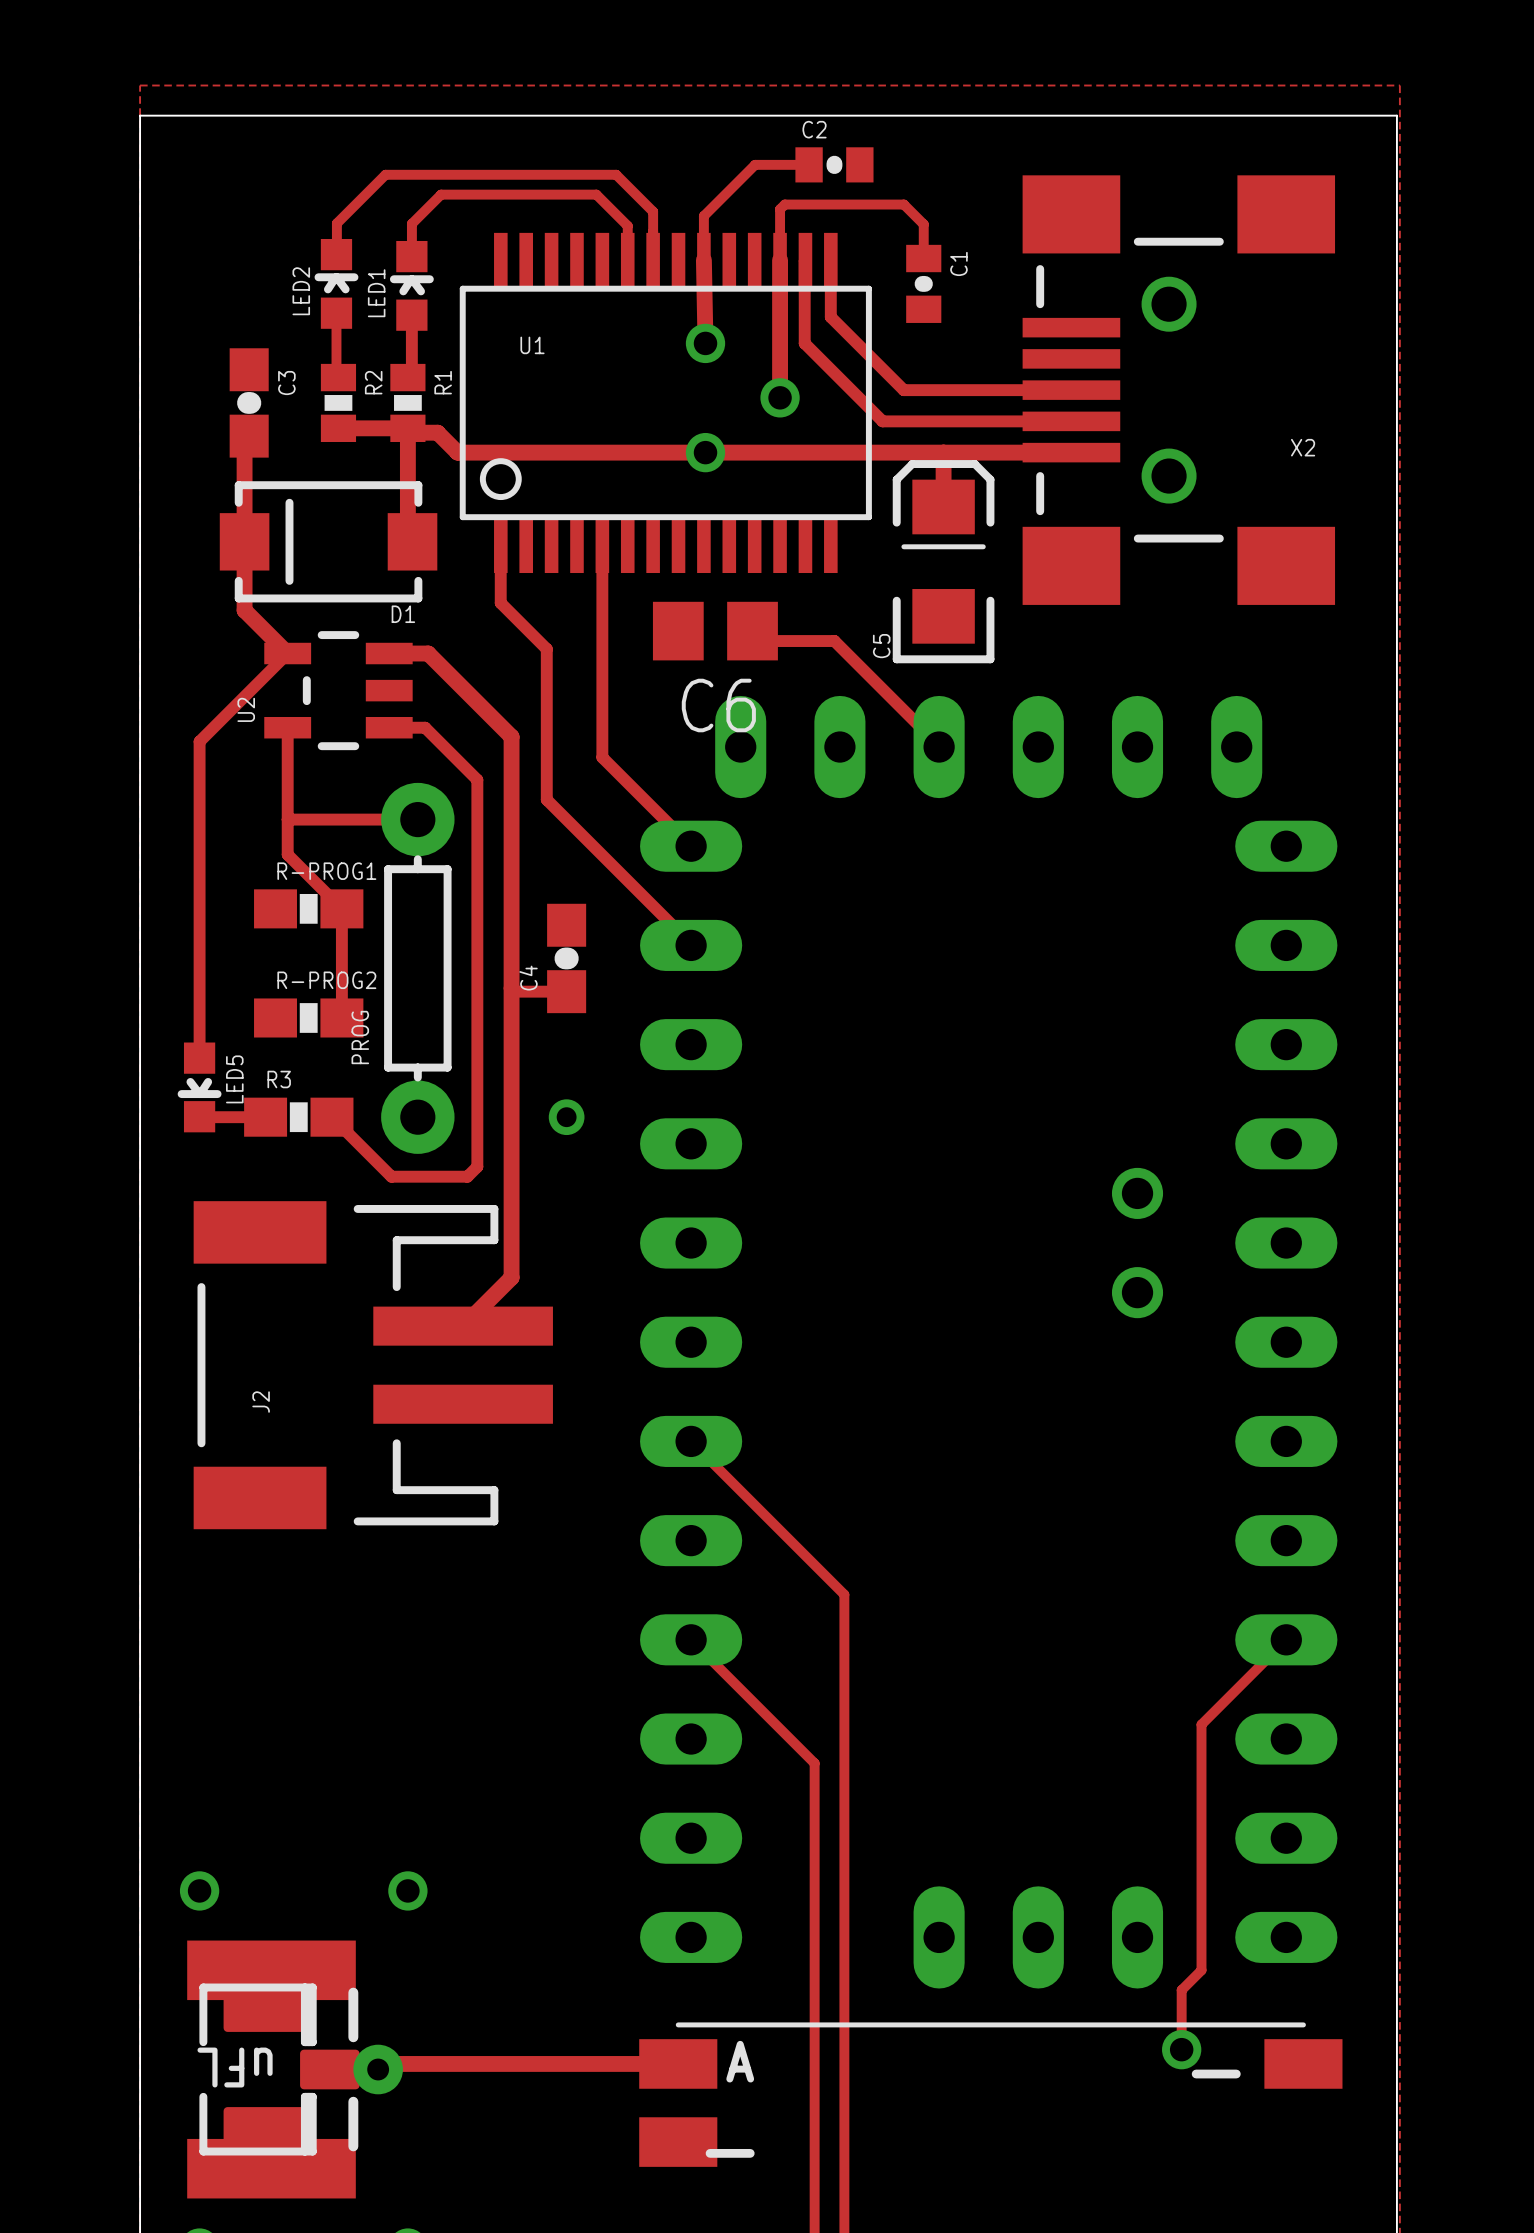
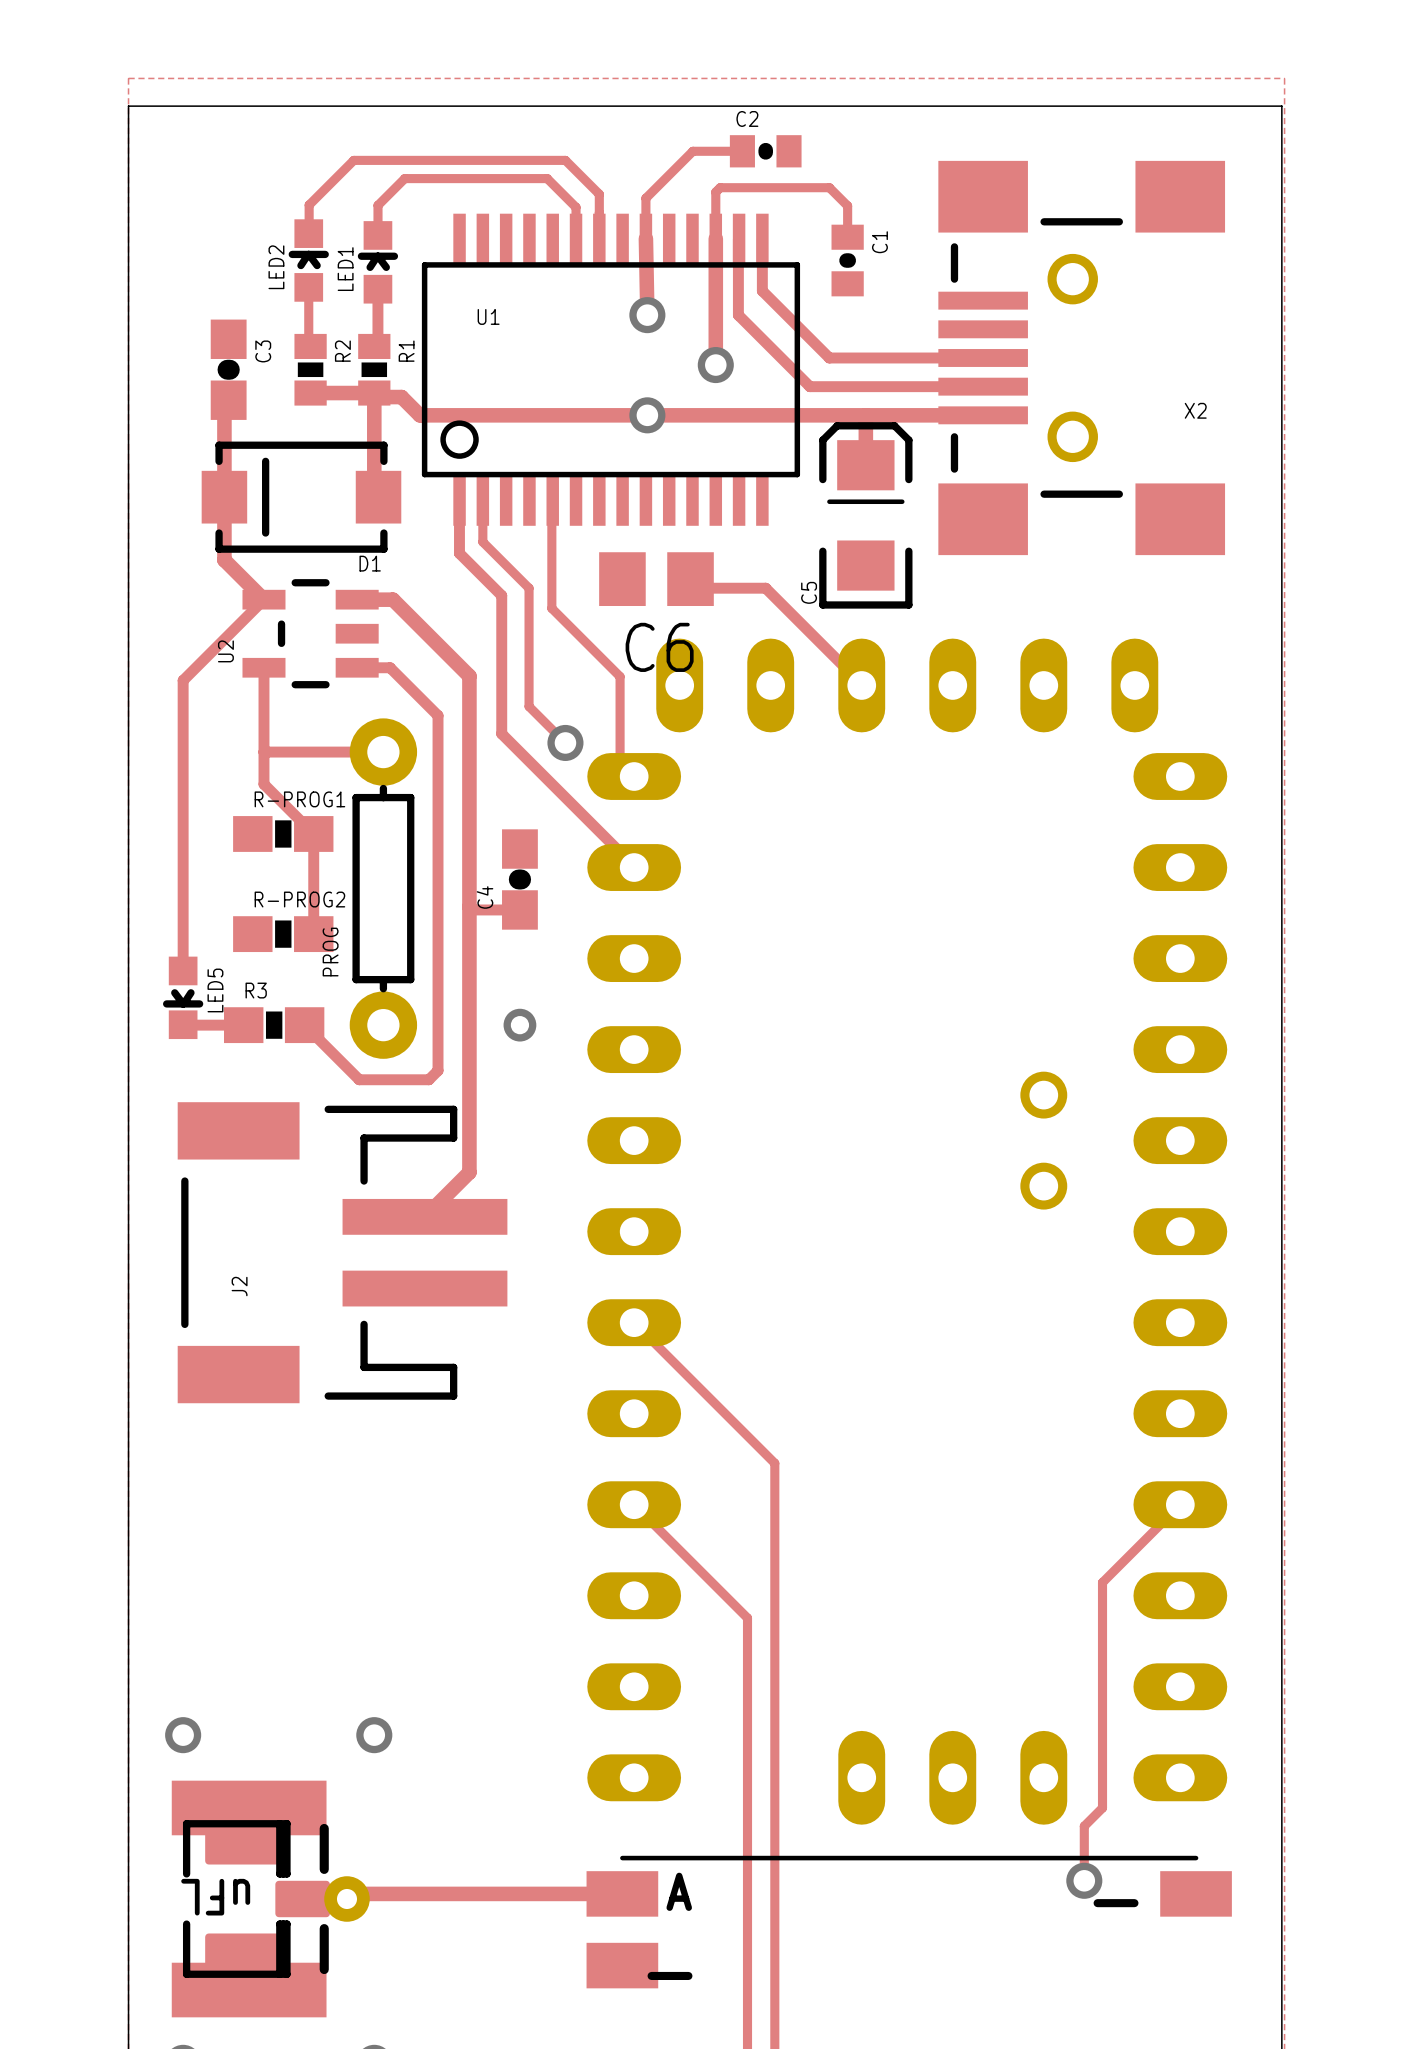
track: none -> (482, 500) (482, 542) (529, 588) (529, 706) (565, 742)
track: (602, 545) (602, 757) (691, 846) -> (552, 500) (551, 608) (620, 676) (620, 776) (634, 776)
via: none -> (565, 742)

